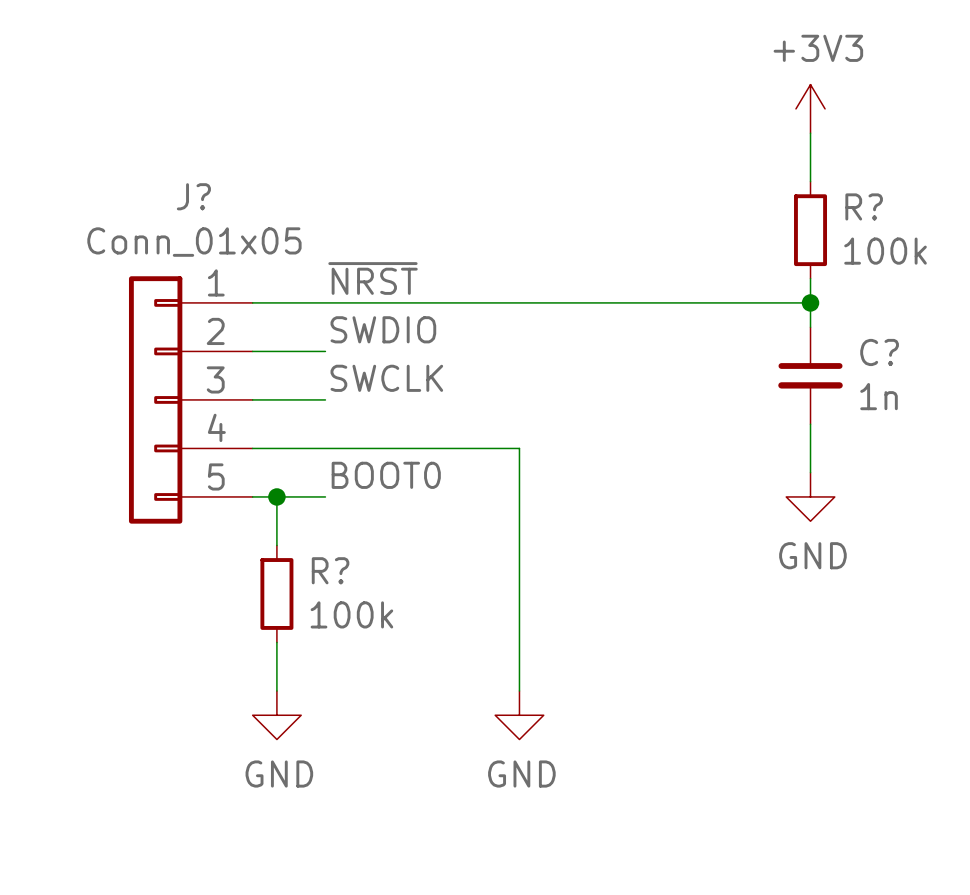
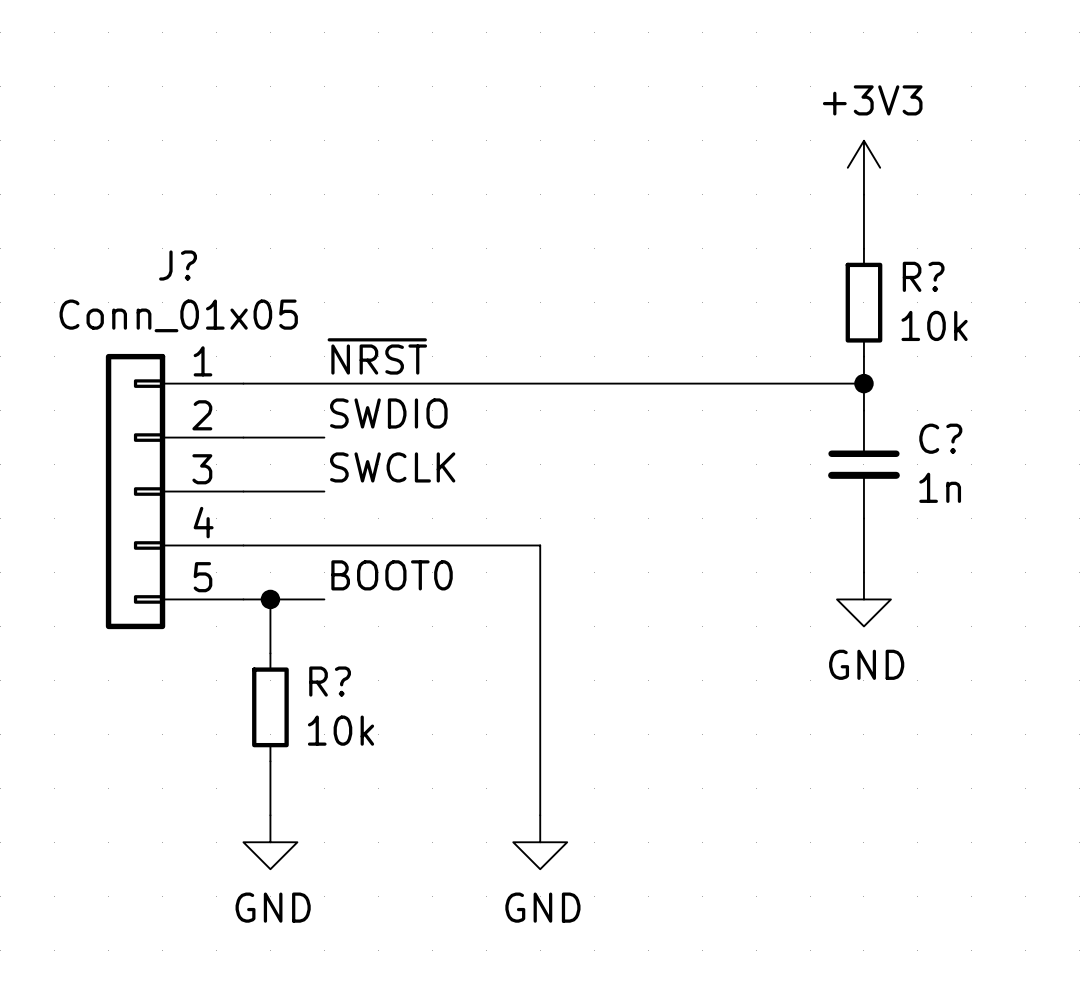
R? value: 100k (885, 251) -> 10k (934, 325)
R? value: 100k (351, 614) -> 10k (341, 730)

